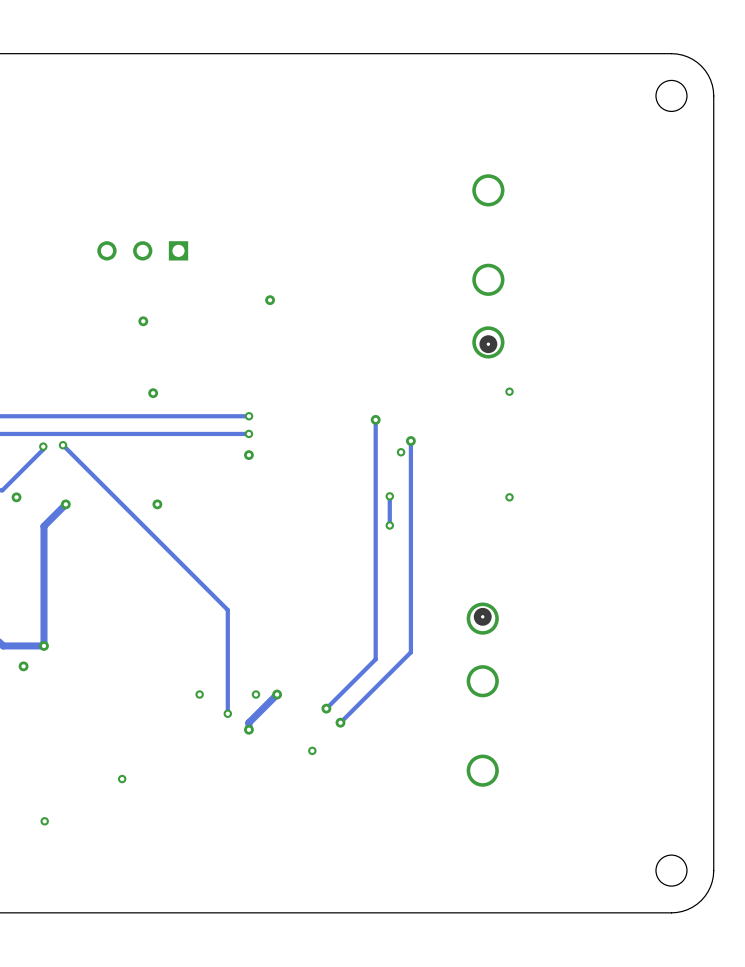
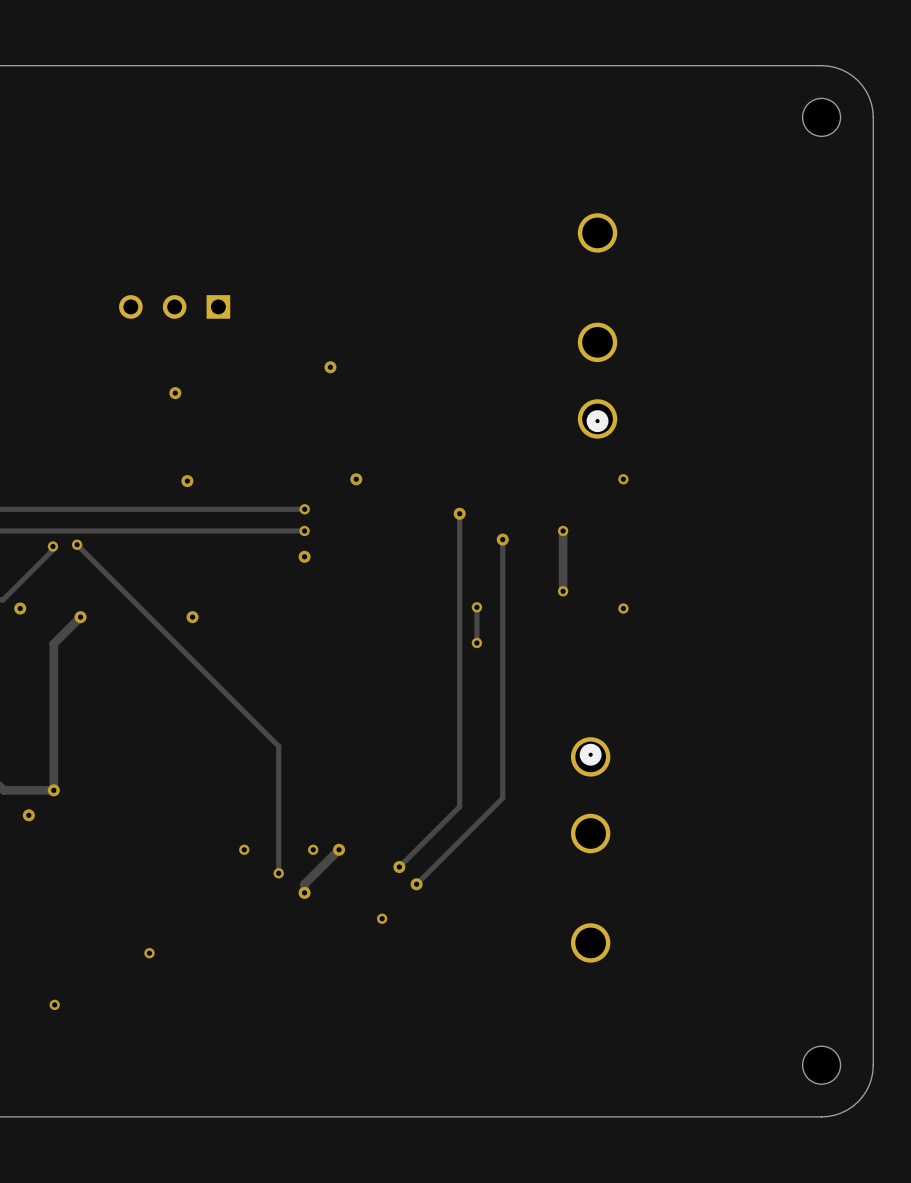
via: none -> (356, 479)
track: none -> (563, 530) (563, 591)
via: none -> (563, 530)
via: (401, 452) -> none
via: none -> (563, 591)

